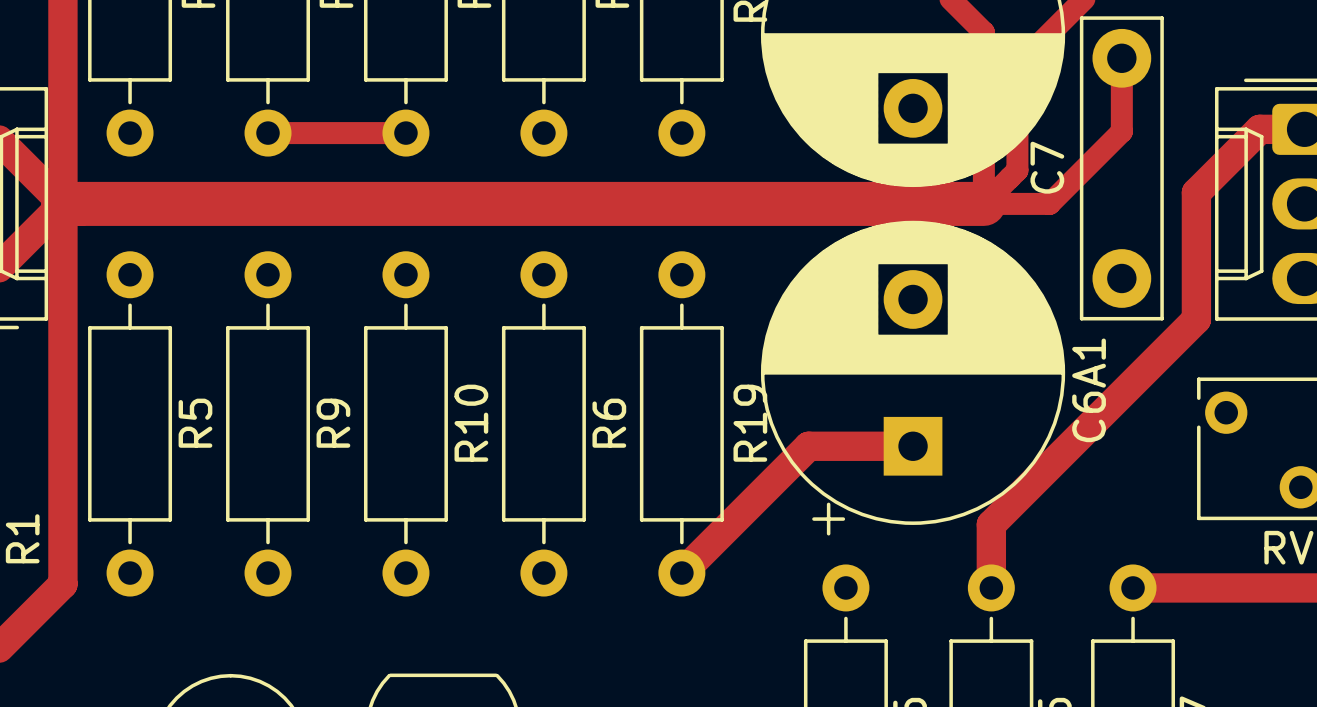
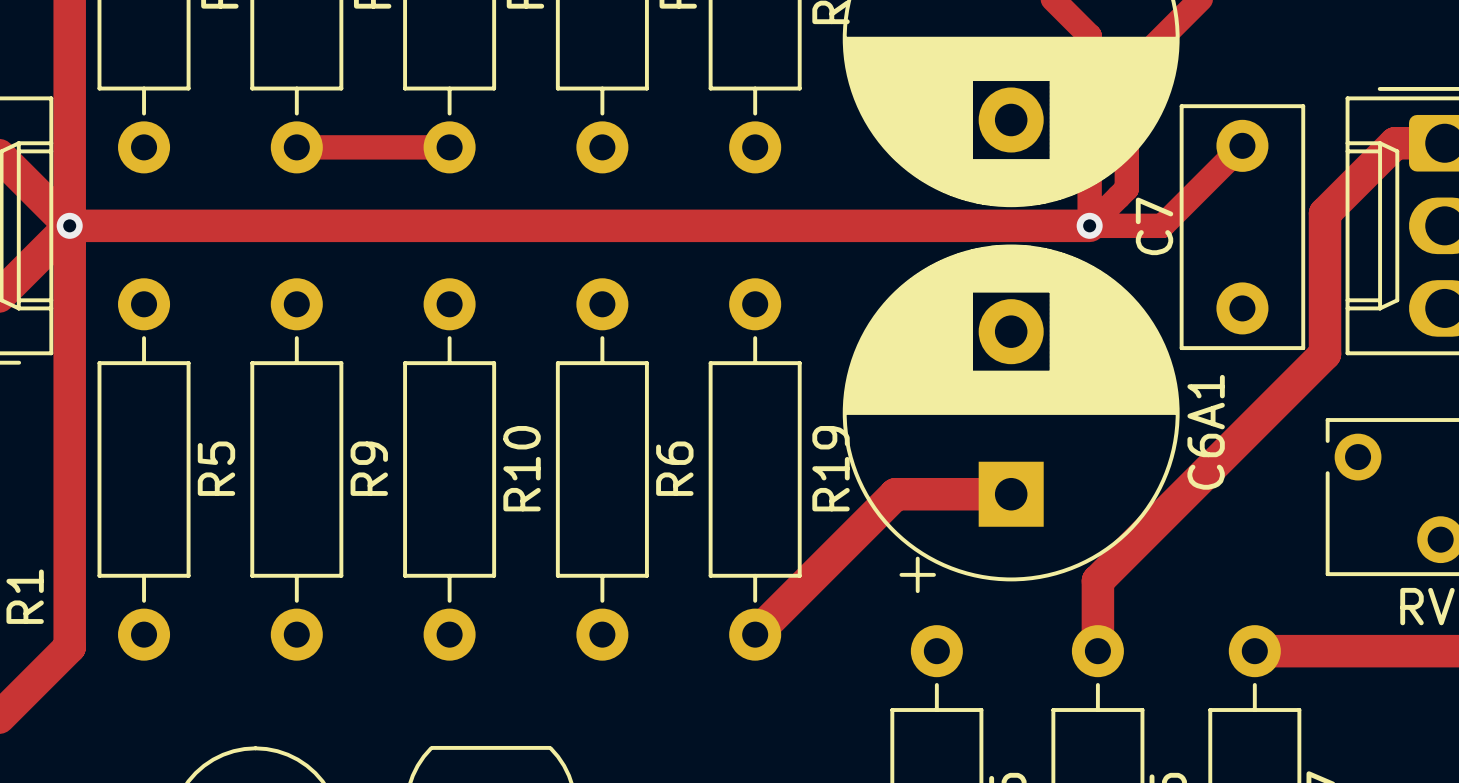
C7 footprint: [1079, 16, 1164, 321] -> [1179, 104, 1306, 351]
track: (1121, 58) (1121, 131) -> none
track width: thick (62, 203) (983, 203) -> thin (69, 225) (1089, 225)
via: none -> (69, 225)
via: none -> (1089, 225)

